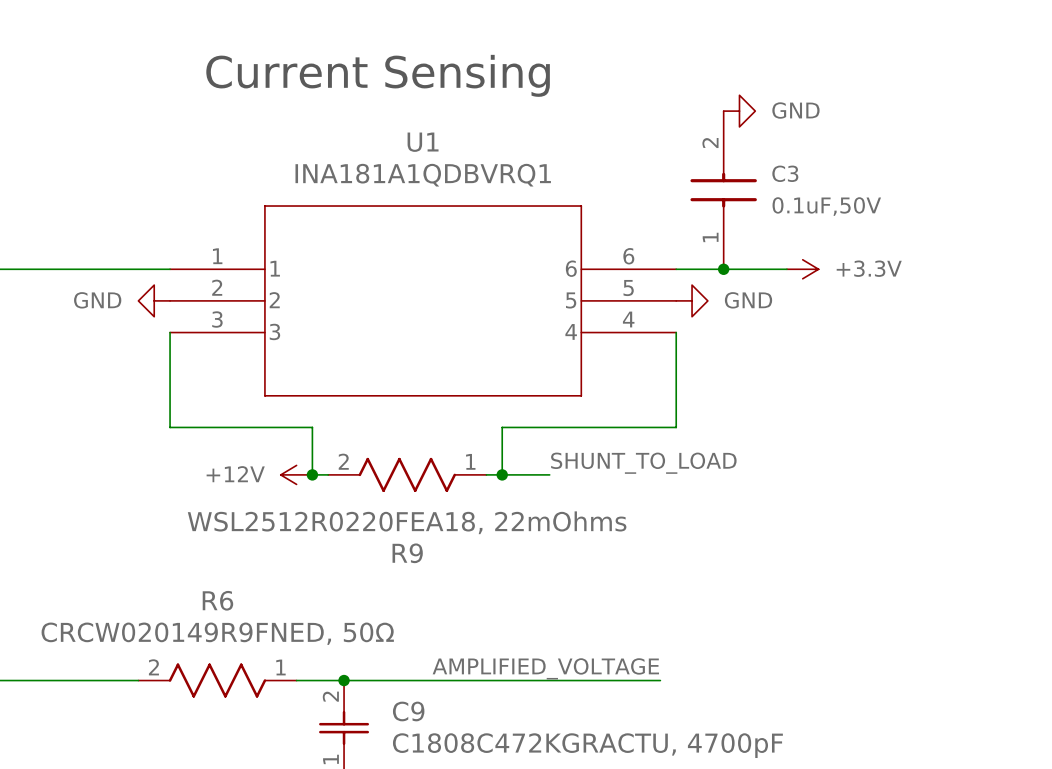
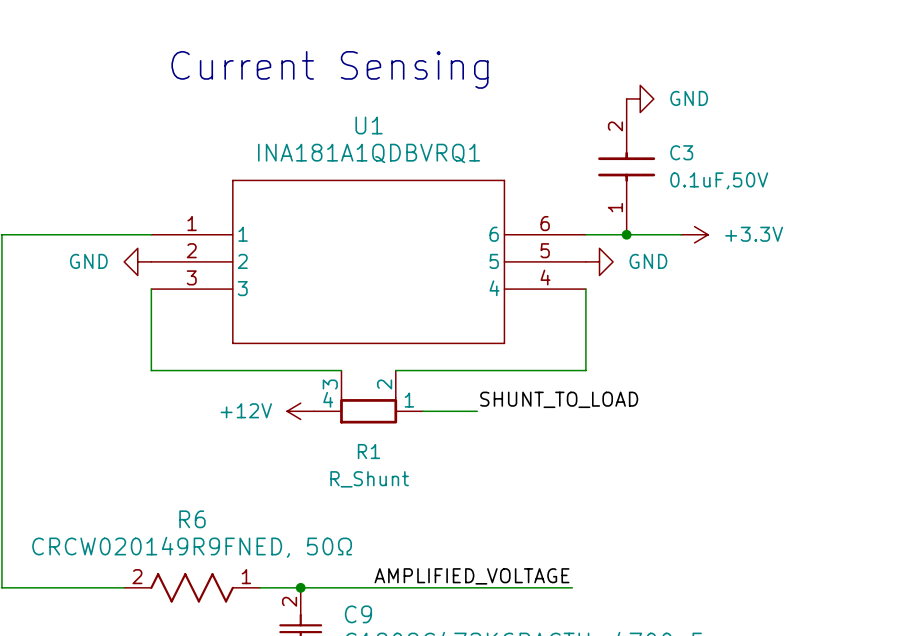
wire: (312, 427) (312, 474) (328, 474) -> (273, 370) (341, 370)
wire: (502, 427) (502, 474) -> (436, 370) (395, 370)
R1: none -> R_Shunt (368, 397)
power symbol position: +12V (296, 474) -> +12V (300, 411)
junction: (312, 474) -> none
R9: WSL2512R0220FEA18, 22mOhms (407, 474) -> none
junction: (502, 474) -> none

